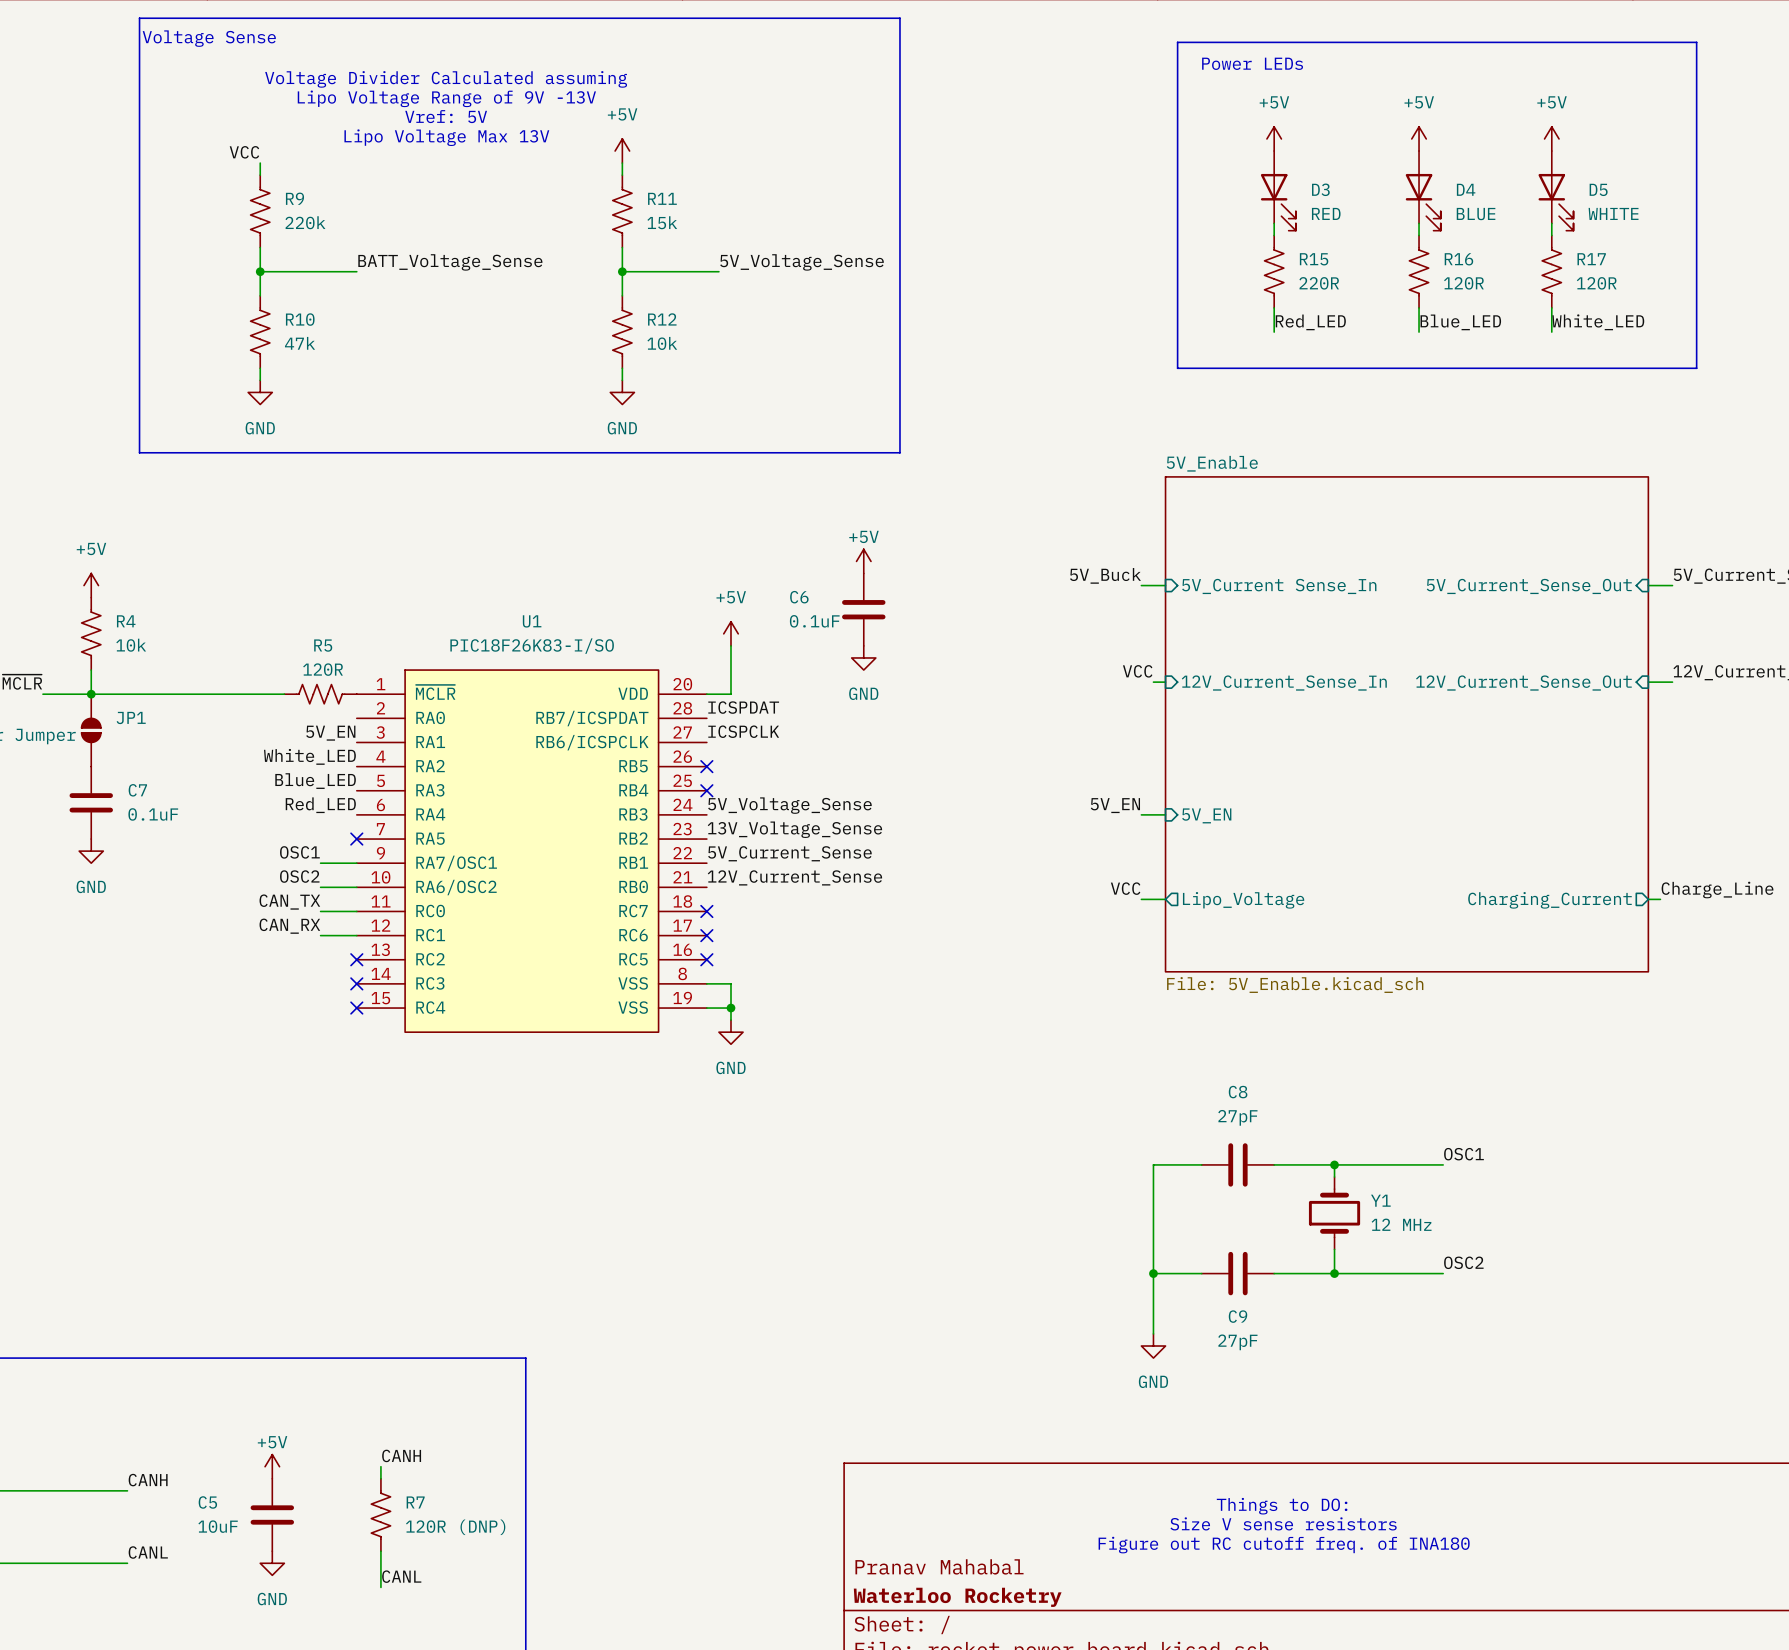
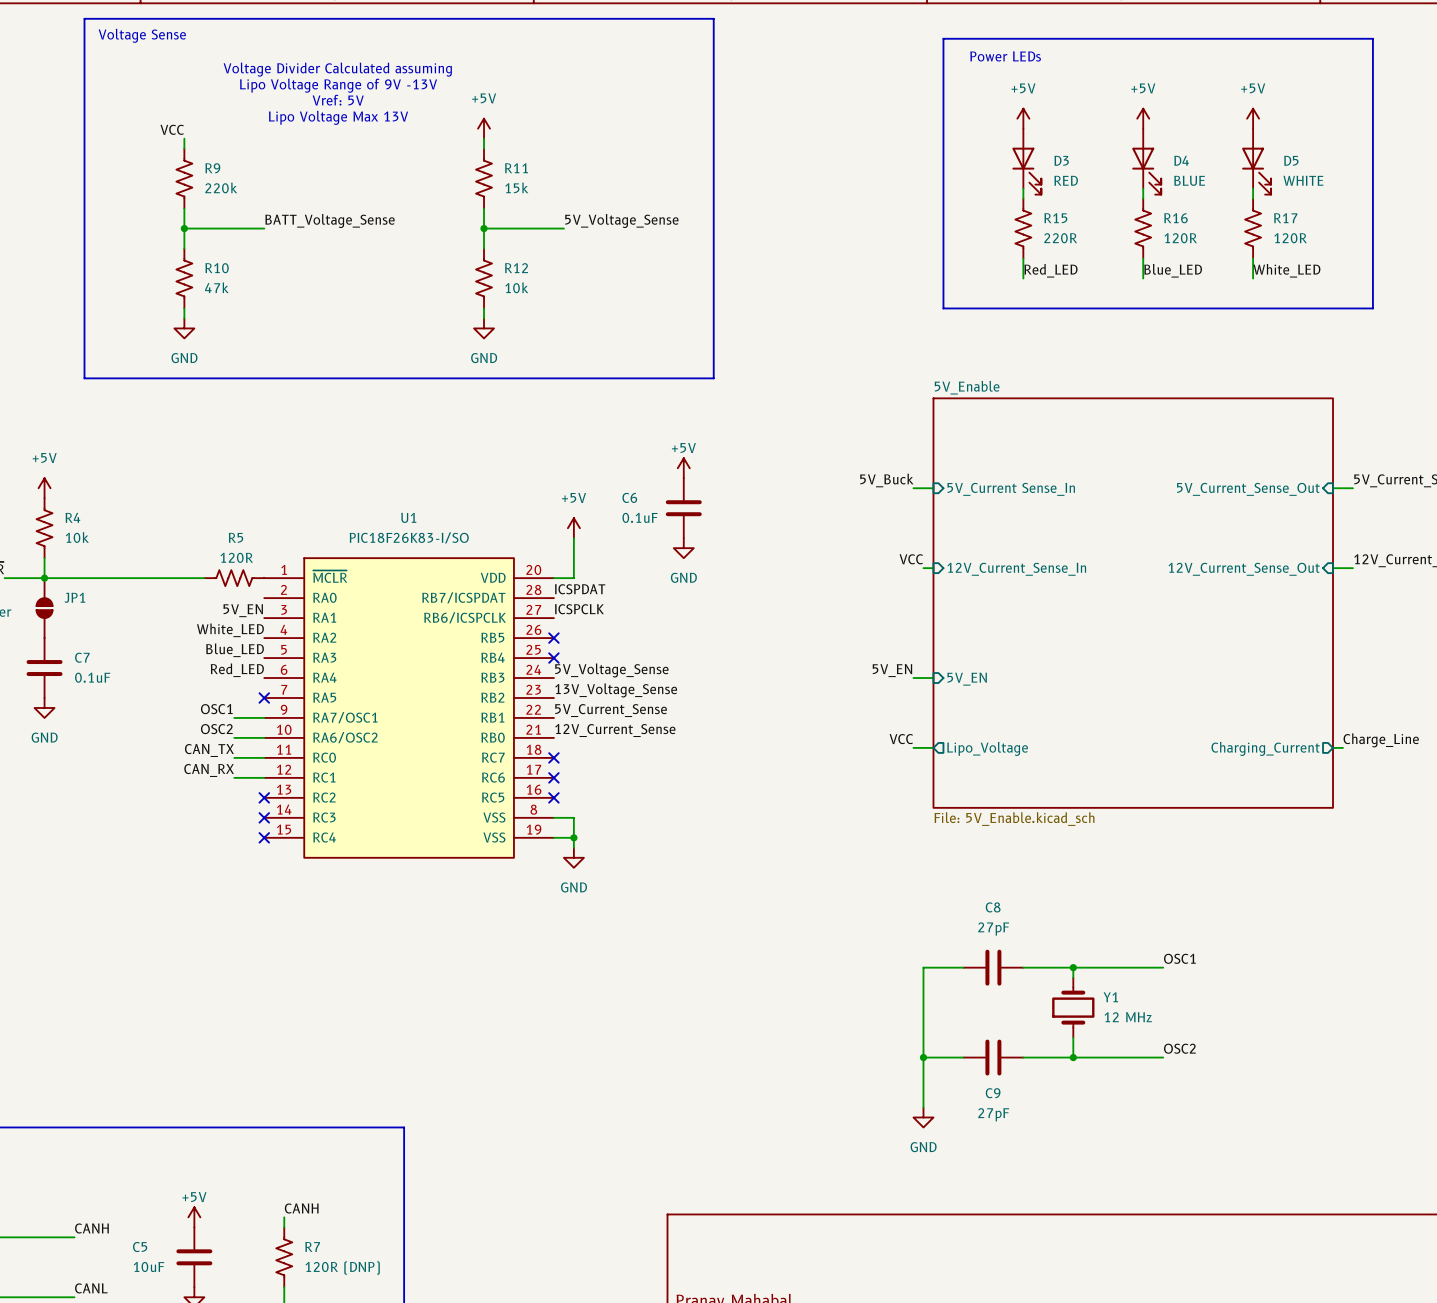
text: Things to DO: (1282, 1506) -> none
text: Size V sense resistors (1283, 1523) -> none
text: Figure out RC cutoff freq. of INA180 (1284, 1545) -> none

